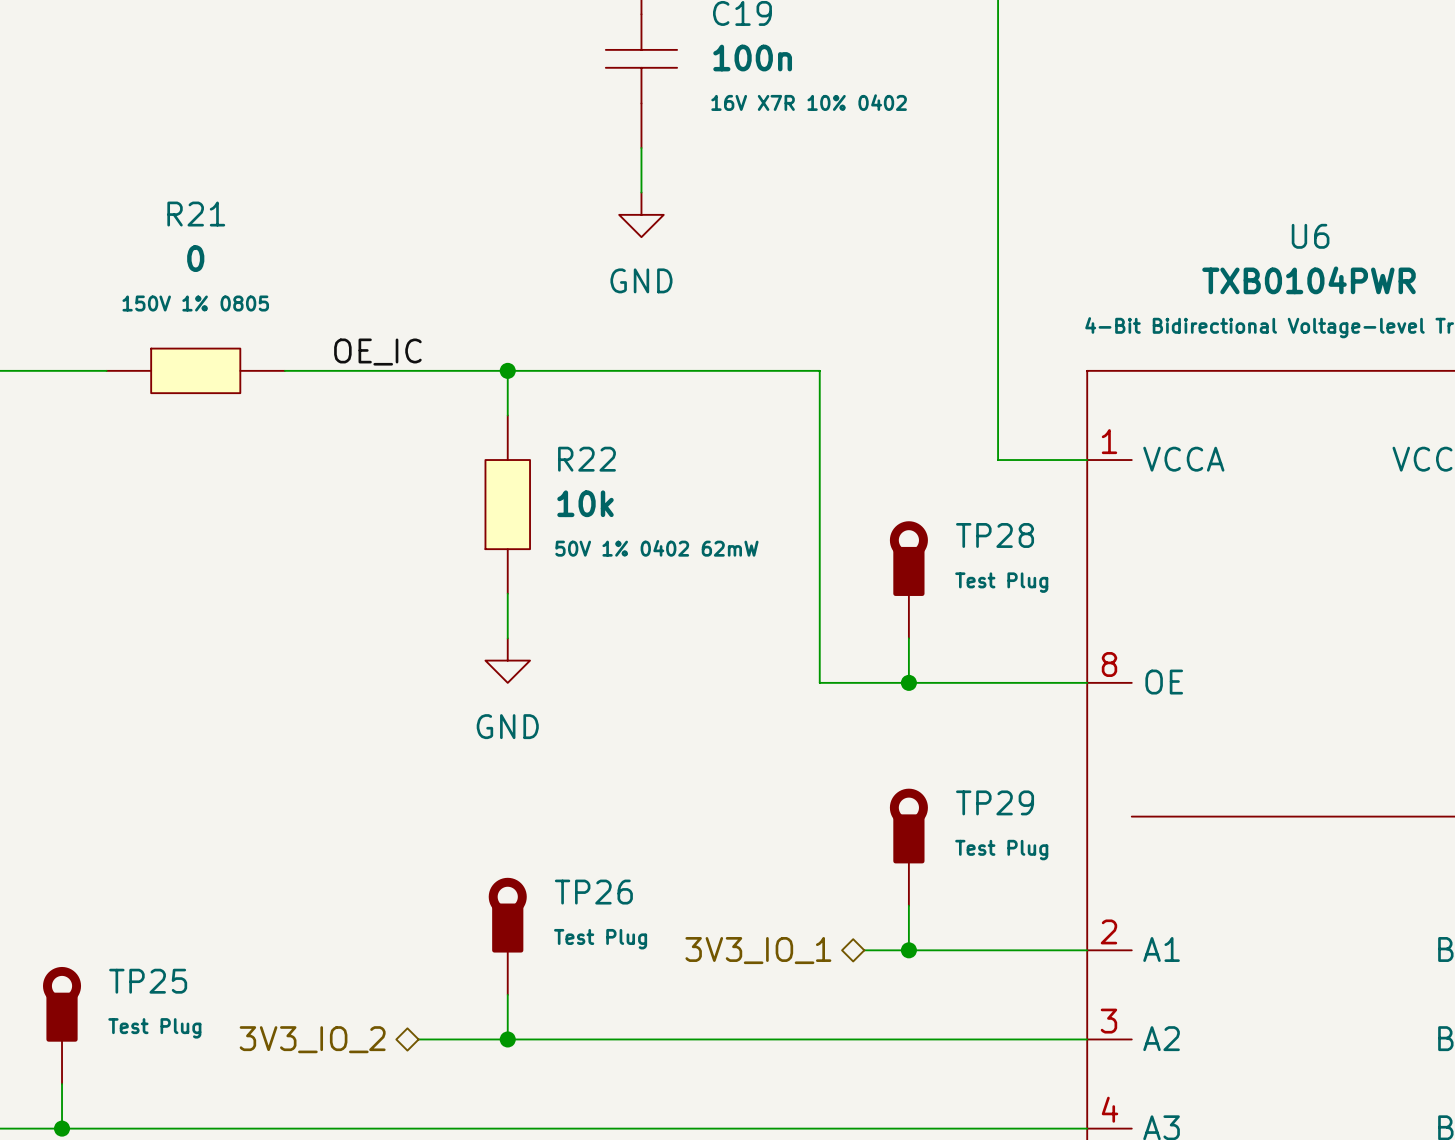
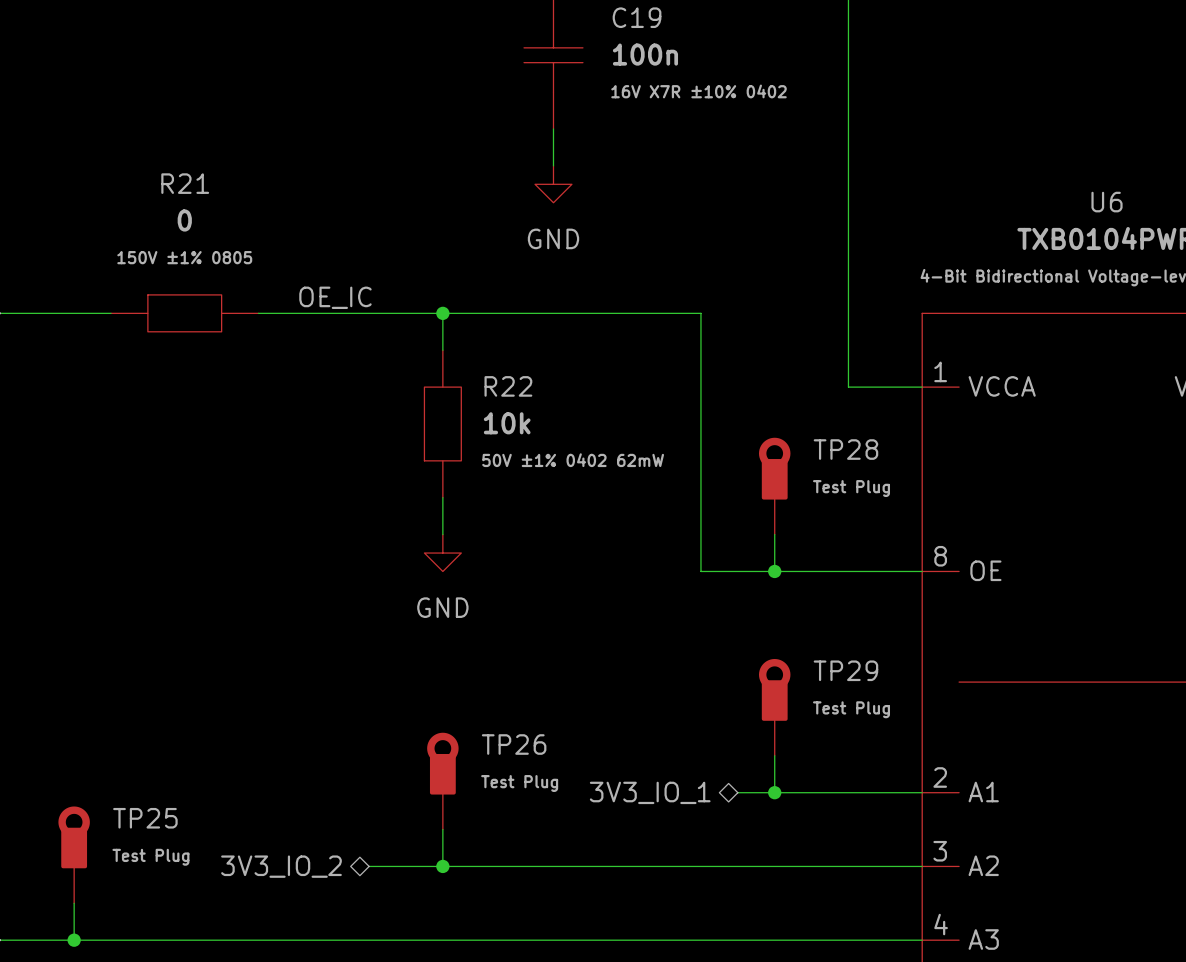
C19 text: 16V X7R 10% 0402 (809, 102) -> 16V X7R ±10% 0402 (699, 91)
R21 text: 150V 1% 0805 (195, 303) -> 150V ±1% 0805 (184, 257)
R22 text: 50V 1% 0402 62mW (656, 548) -> 50V ±1% 0402 62mW (573, 460)

